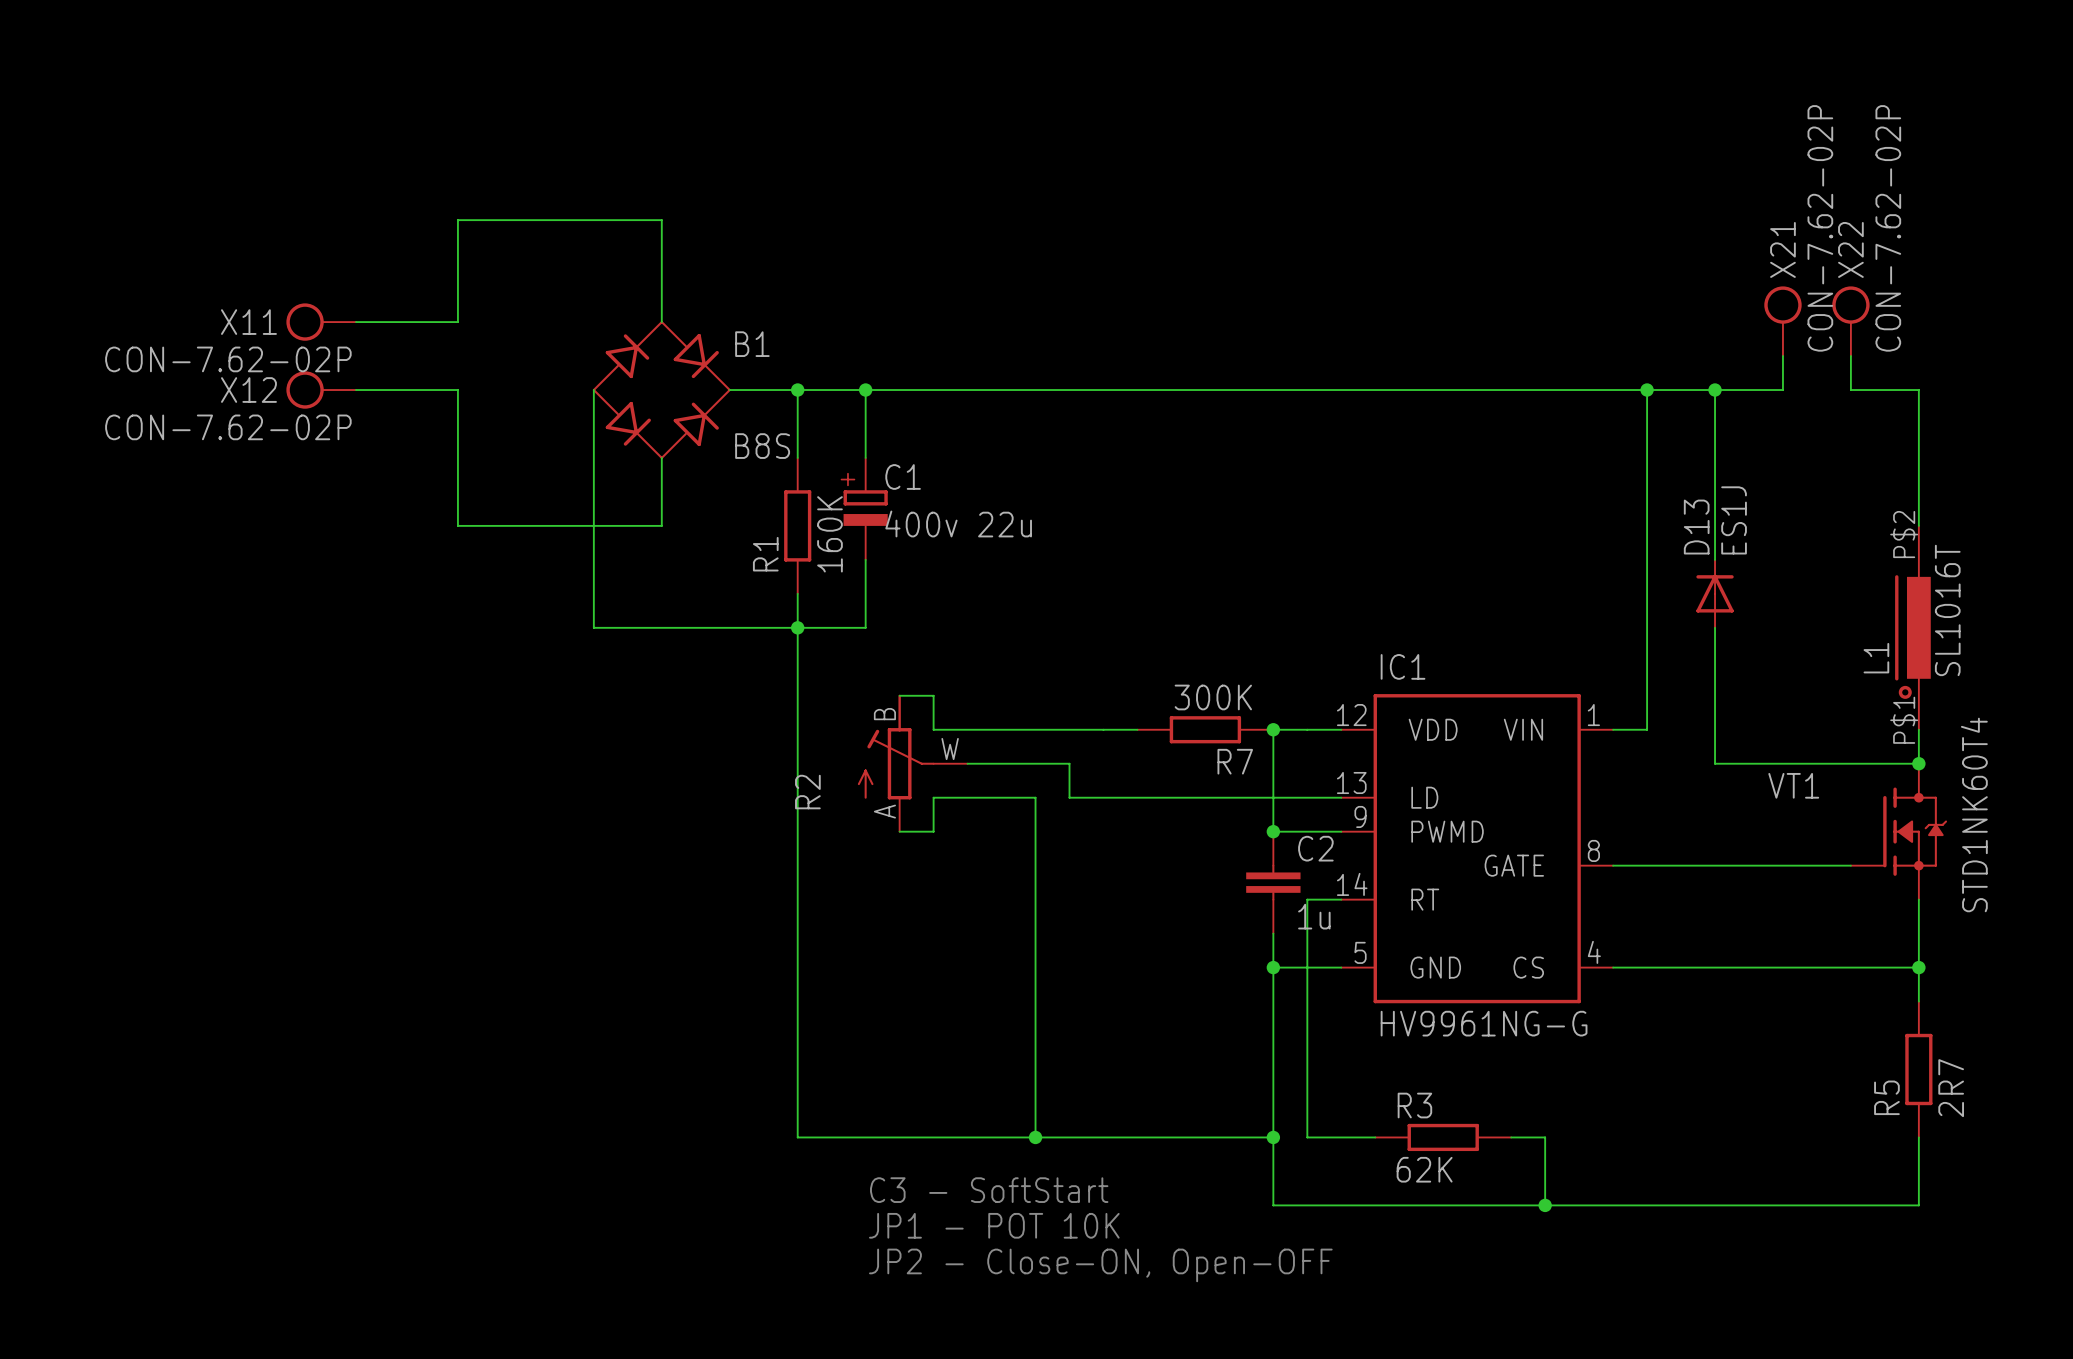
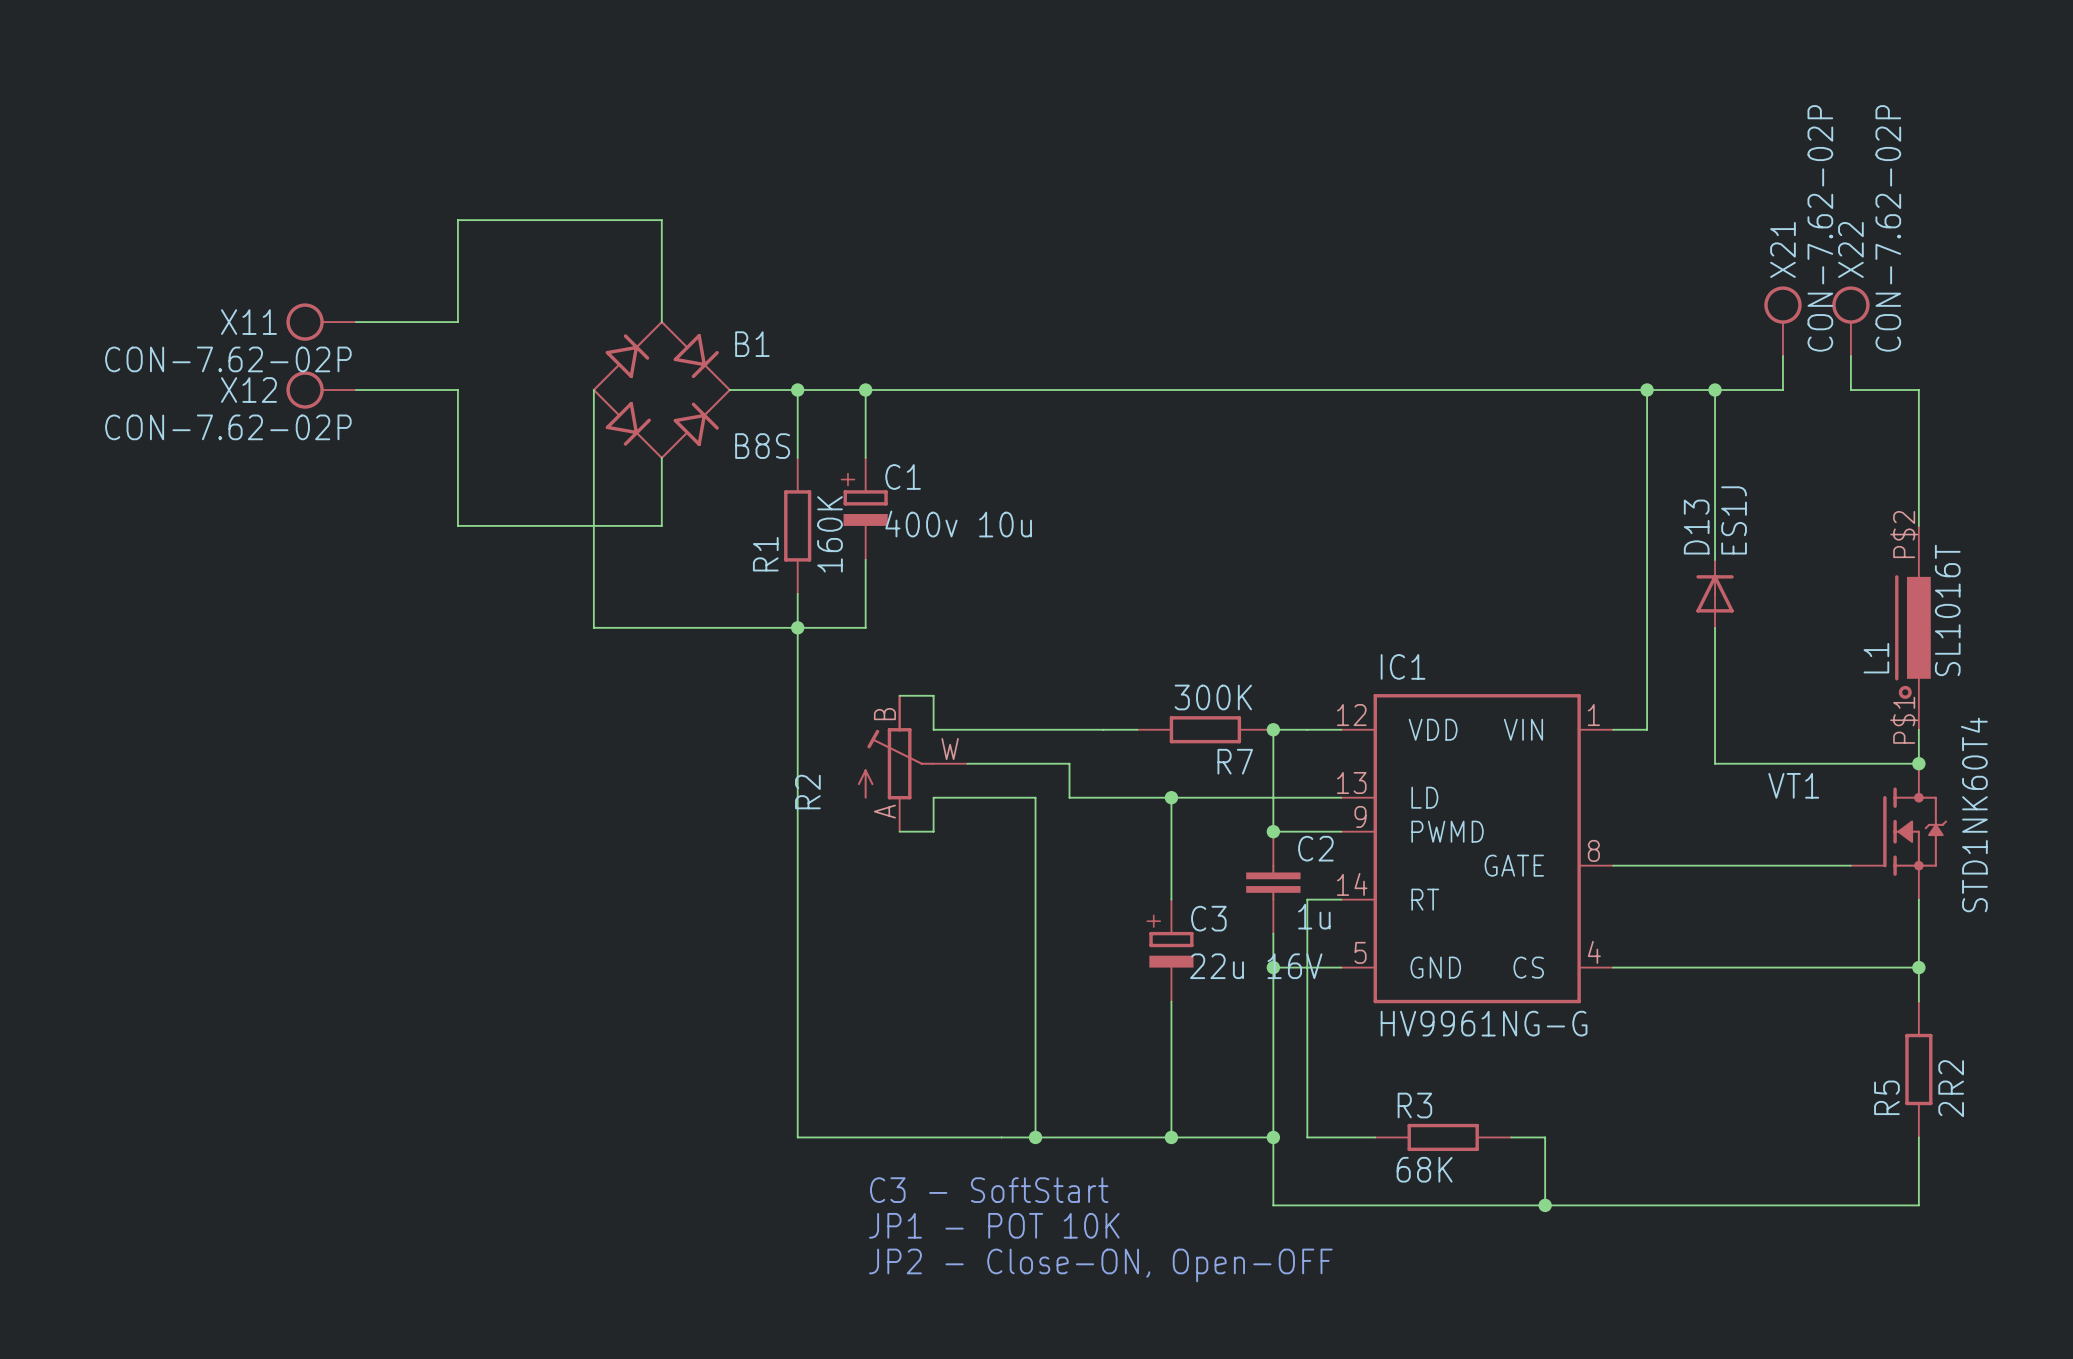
C1 value: 400v 22u (958, 523) -> 400v 10u (958, 523)
wire: none -> (1171, 797) (1171, 899)
junction: none -> (1171, 797)
C3: none -> 22u 16V (1171, 950)
wire: none -> (1171, 1001) (1171, 1137)
R5 value: 2R7 (1951, 1088) -> 2R2 (1951, 1088)
junction: none -> (1171, 1137)
R3 value: 62K (1424, 1169) -> 68K (1424, 1169)

